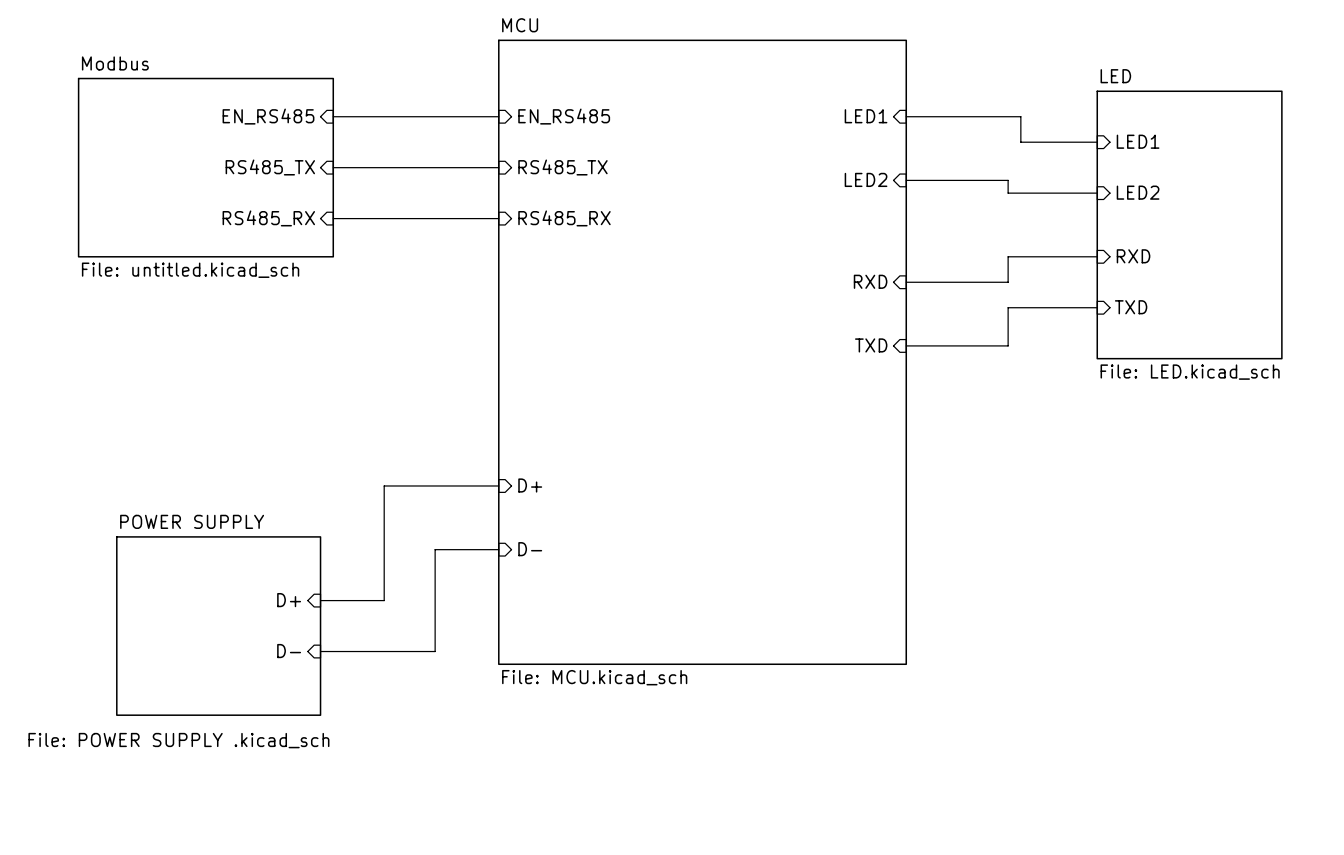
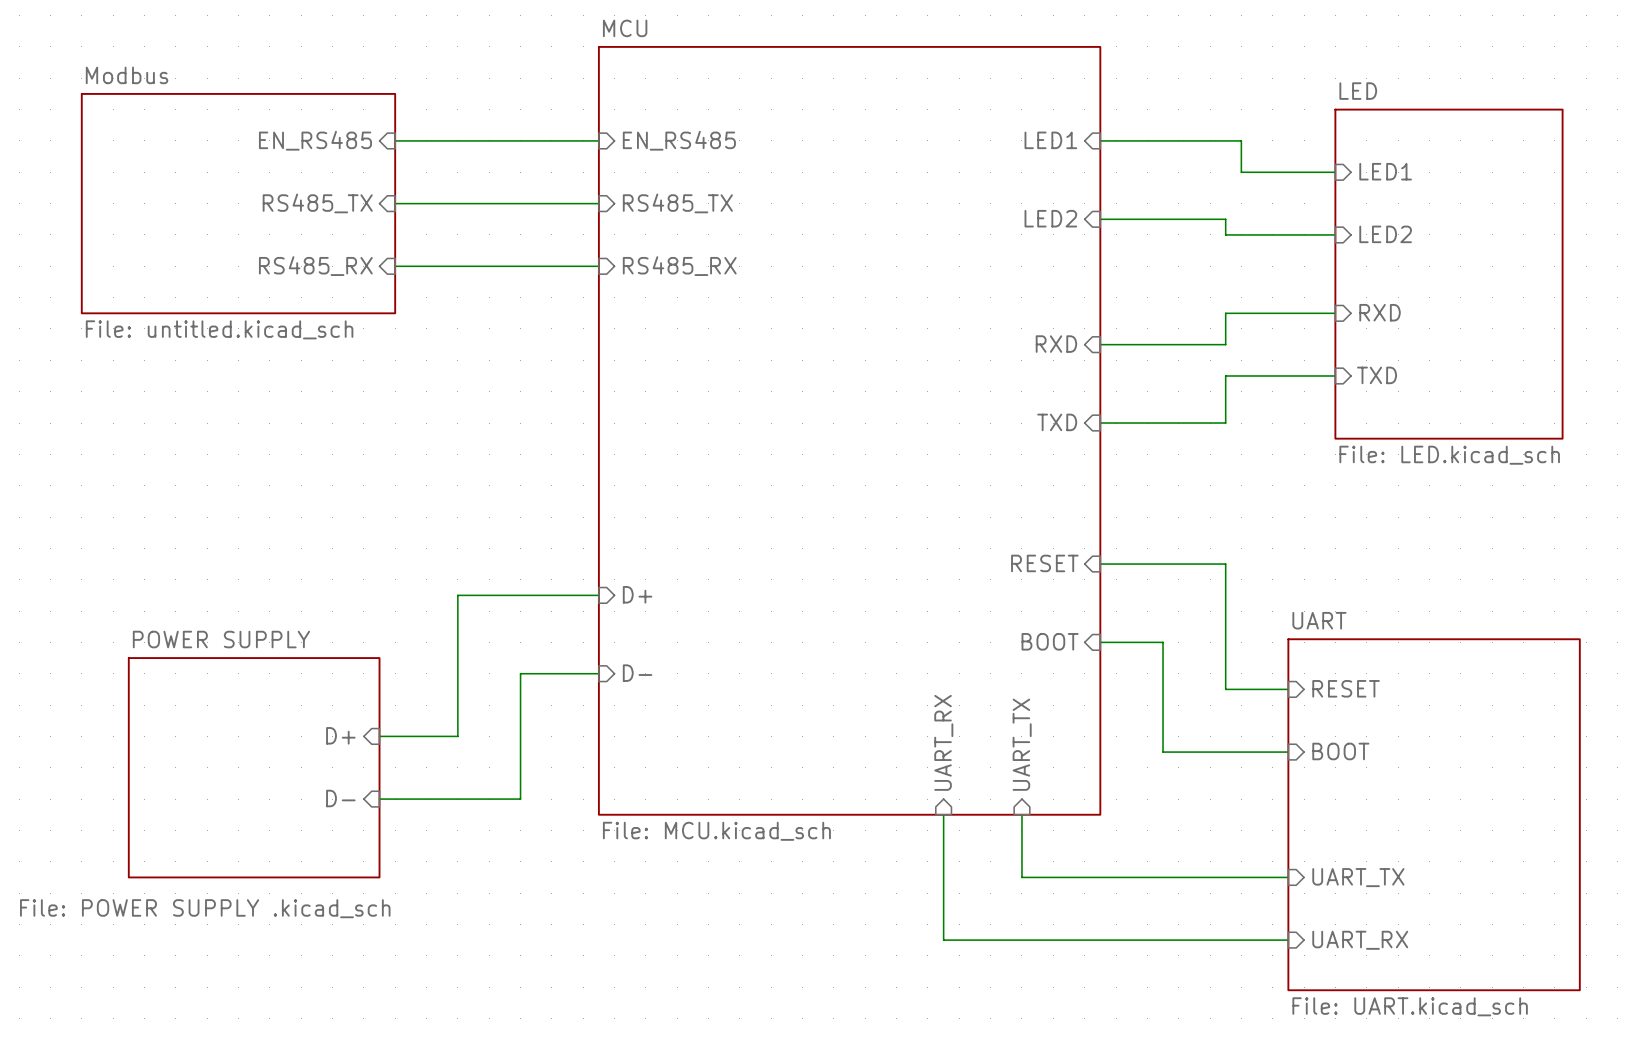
sheet pin: none -> RESET (1044, 563)
wire: none -> (1100, 564) (1225, 564) (1225, 689) (1288, 689)
sheet pin: none -> BOOT (1050, 641)
wire: none -> (1100, 642) (1163, 642) (1163, 752) (1288, 752)
sheet pin: none -> RESET (1346, 688)
sheet pin: none -> UART_RX (943, 742)
sheet pin: none -> UART_TX (1022, 744)
sheet pin: none -> BOOT (1340, 751)
wire: none -> (943, 814) (943, 940) (1288, 940)
wire: none -> (1021, 814) (1021, 877) (1288, 877)
sheet UART: none -> File: UART.kicad_sch (1434, 814)
sheet pin: none -> UART_TX (1358, 877)
sheet pin: none -> UART_RX (1360, 940)

